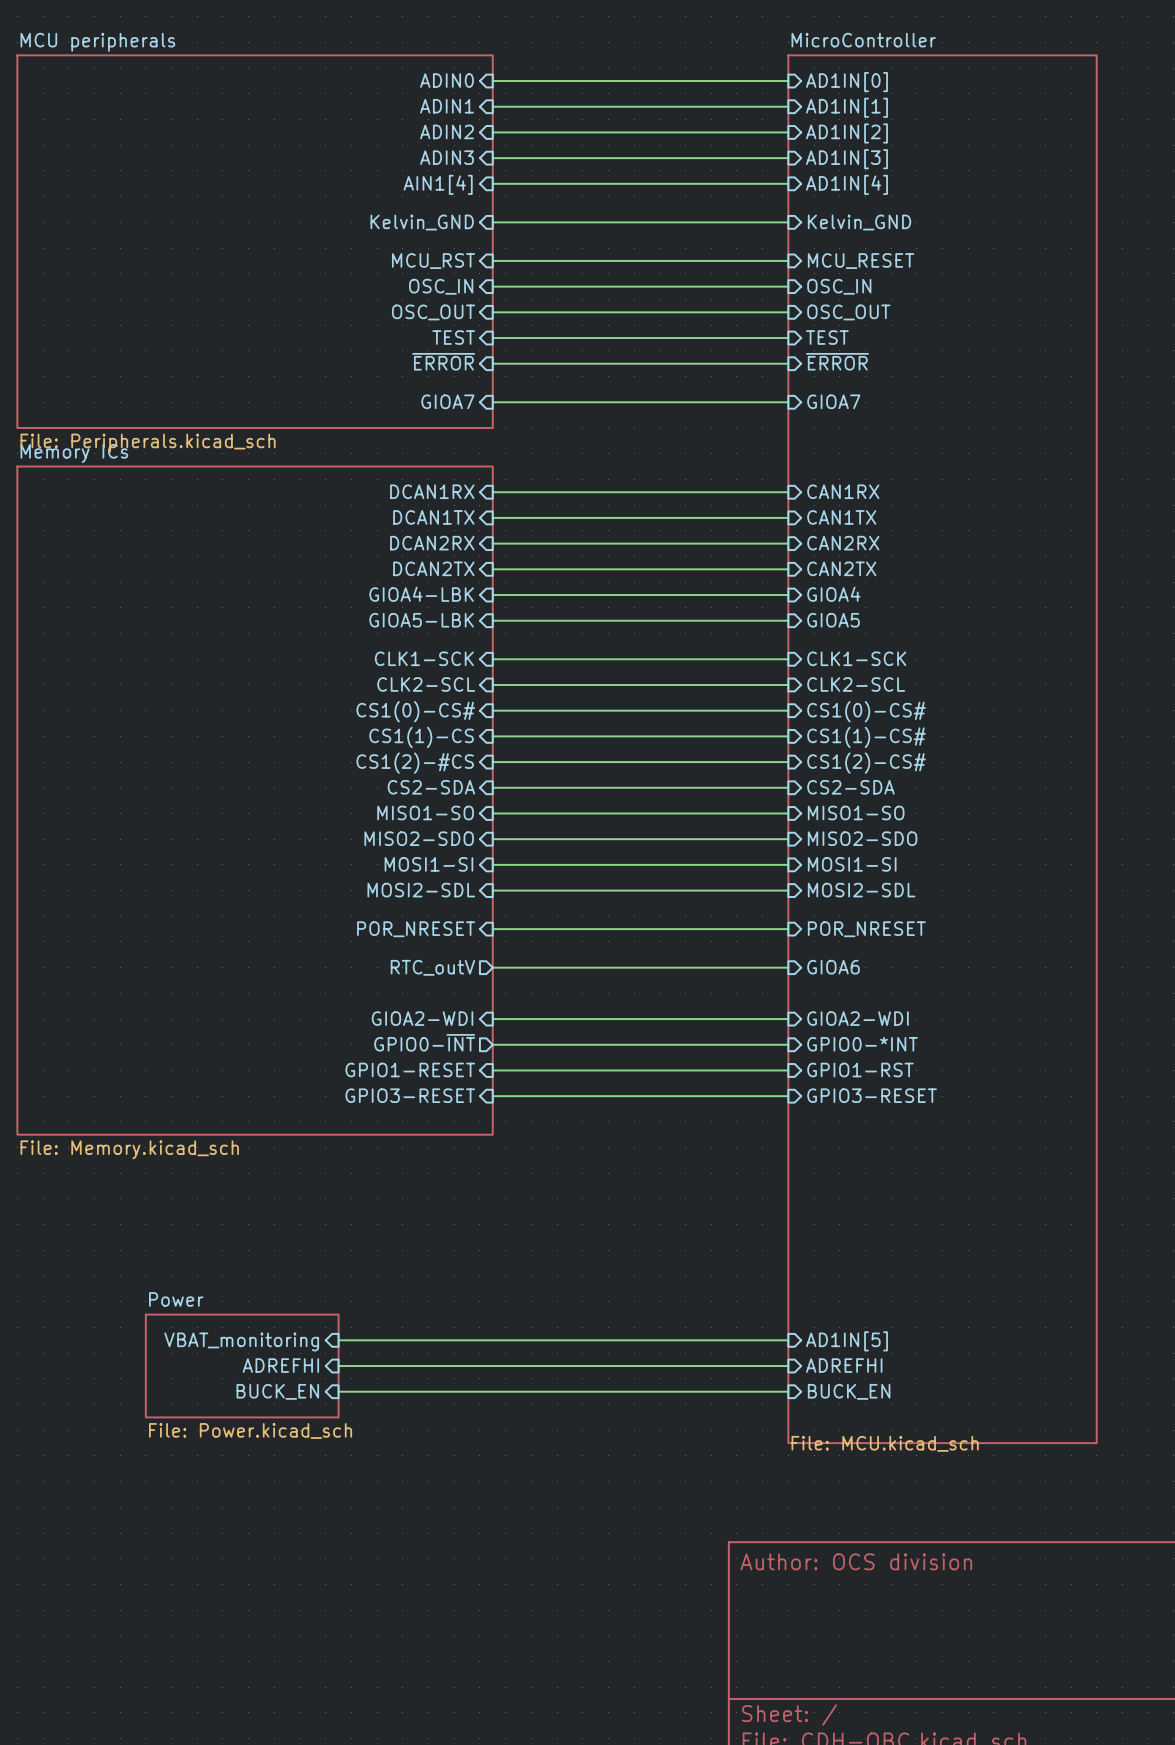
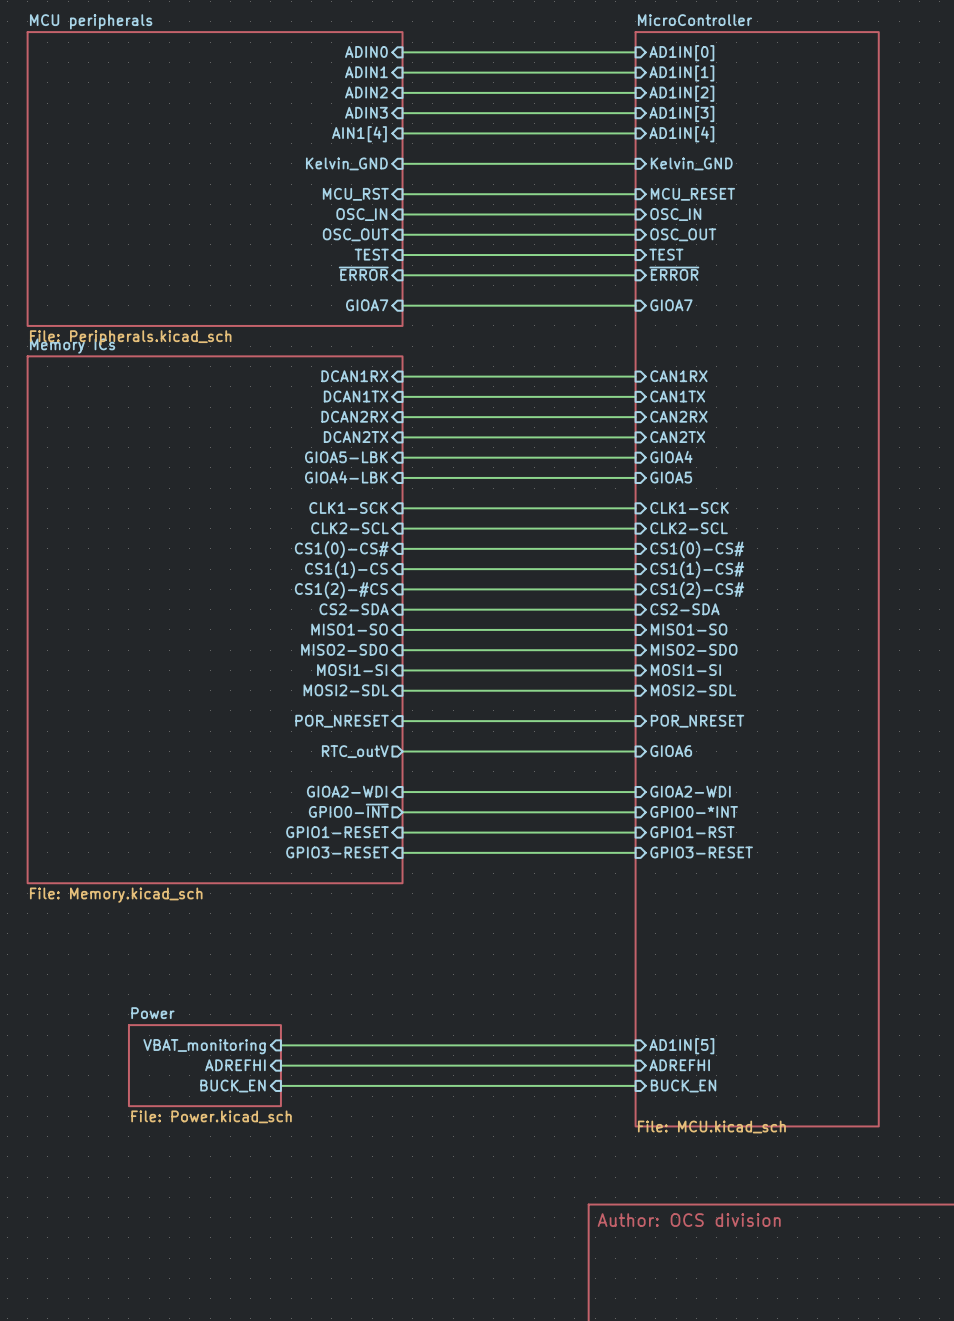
sheet pin: GIOA4-LBK (421, 594) -> GIOA5-LBK (346, 457)
sheet pin: GIOA5-LBK (421, 620) -> GIOA4-LBK (346, 477)

